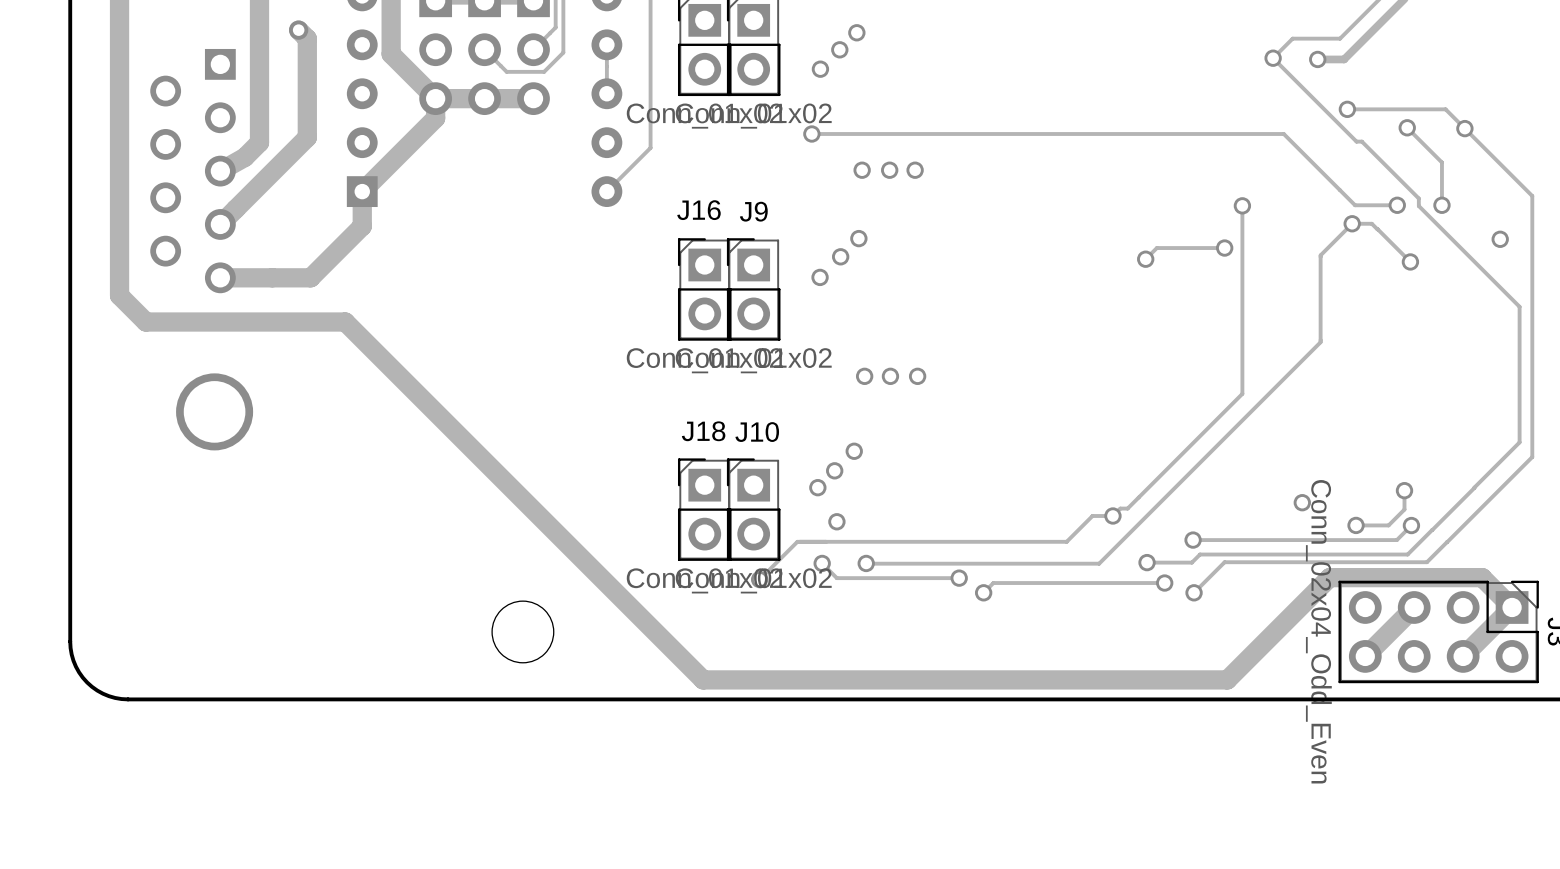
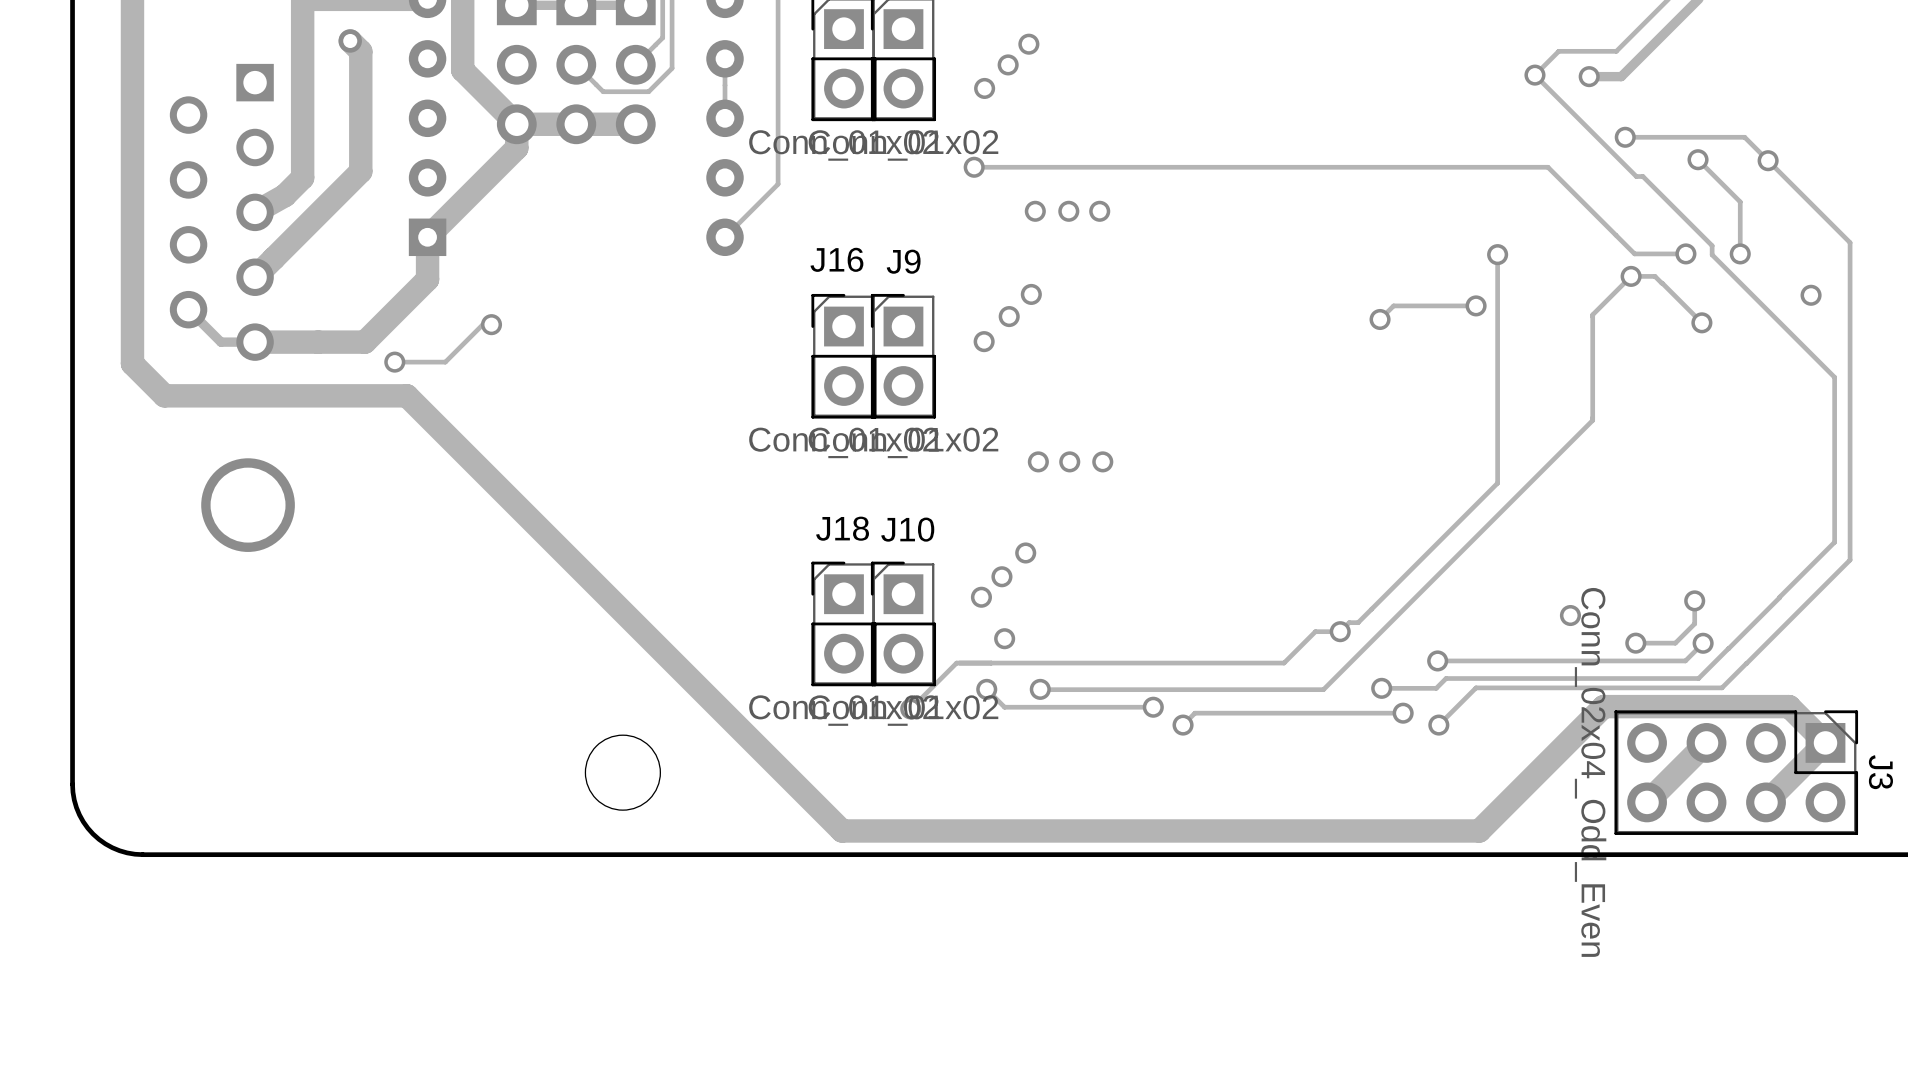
track: none -> (188, 309) (220, 342) (255, 342)
track: none -> (491, 324) (482, 324) (445, 362) (394, 362)
via: none -> (491, 324)
via: none -> (394, 362)

